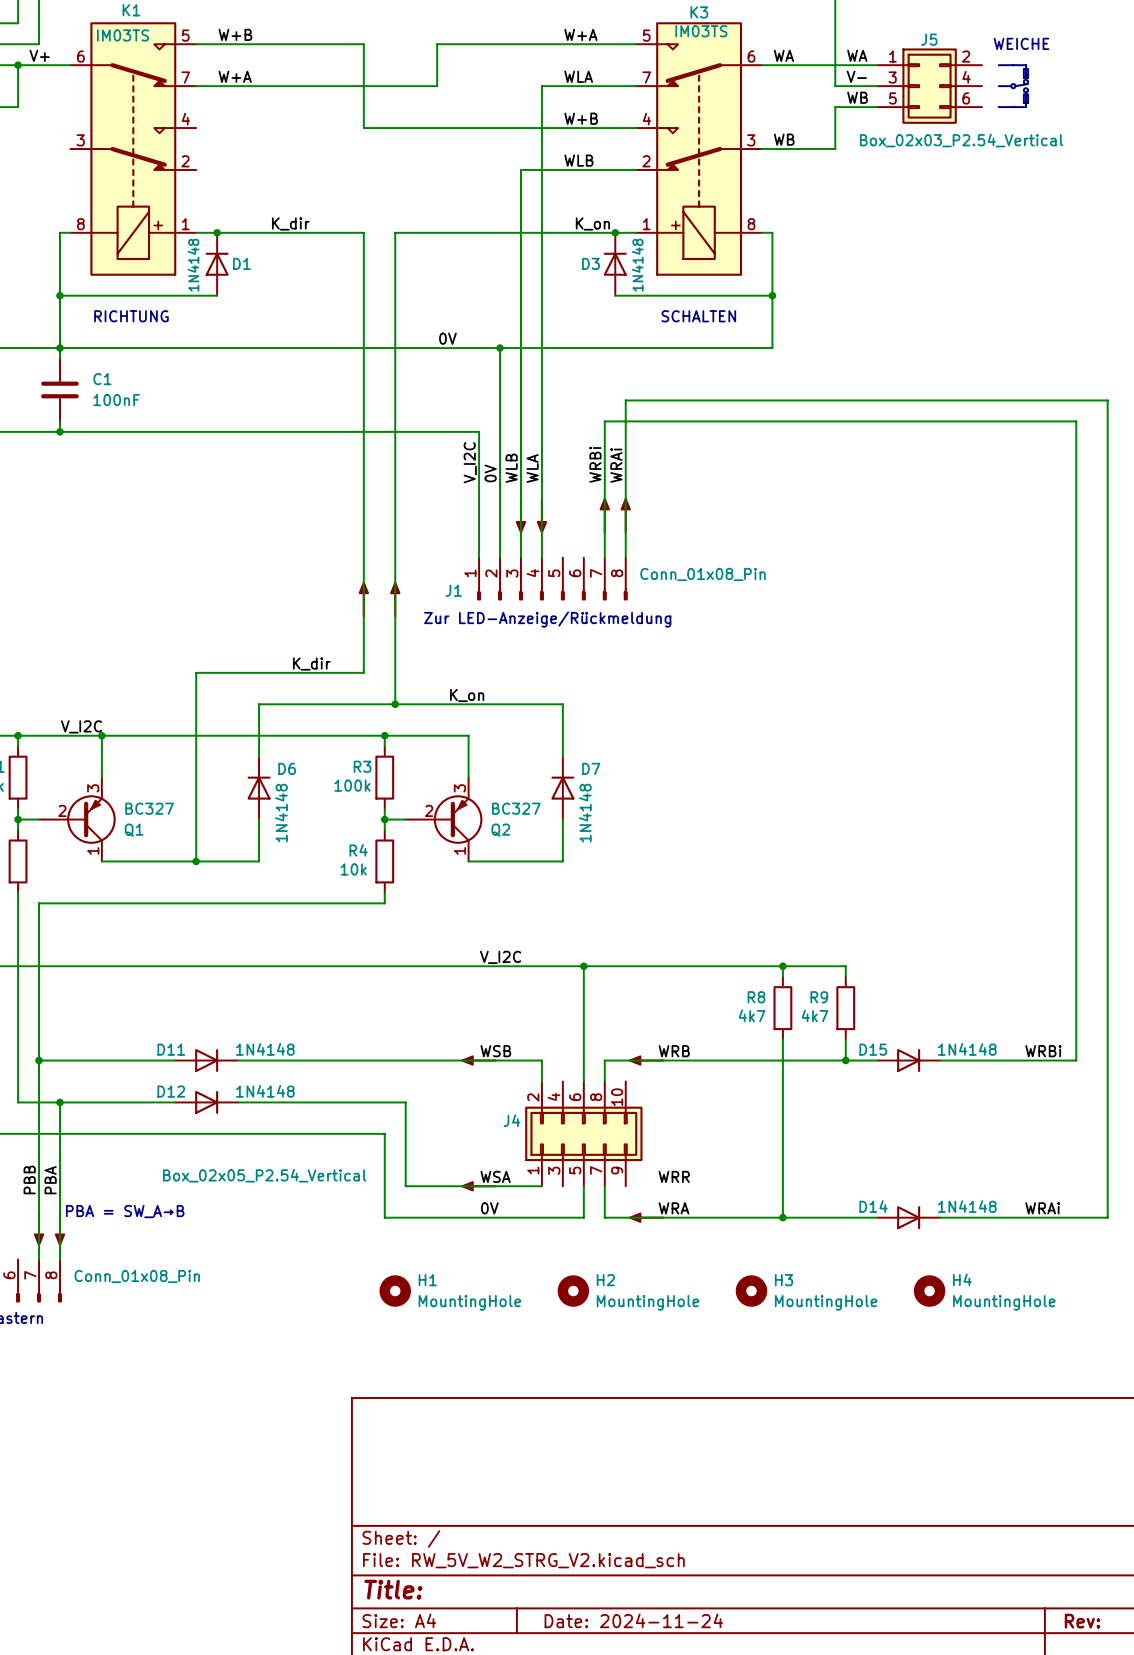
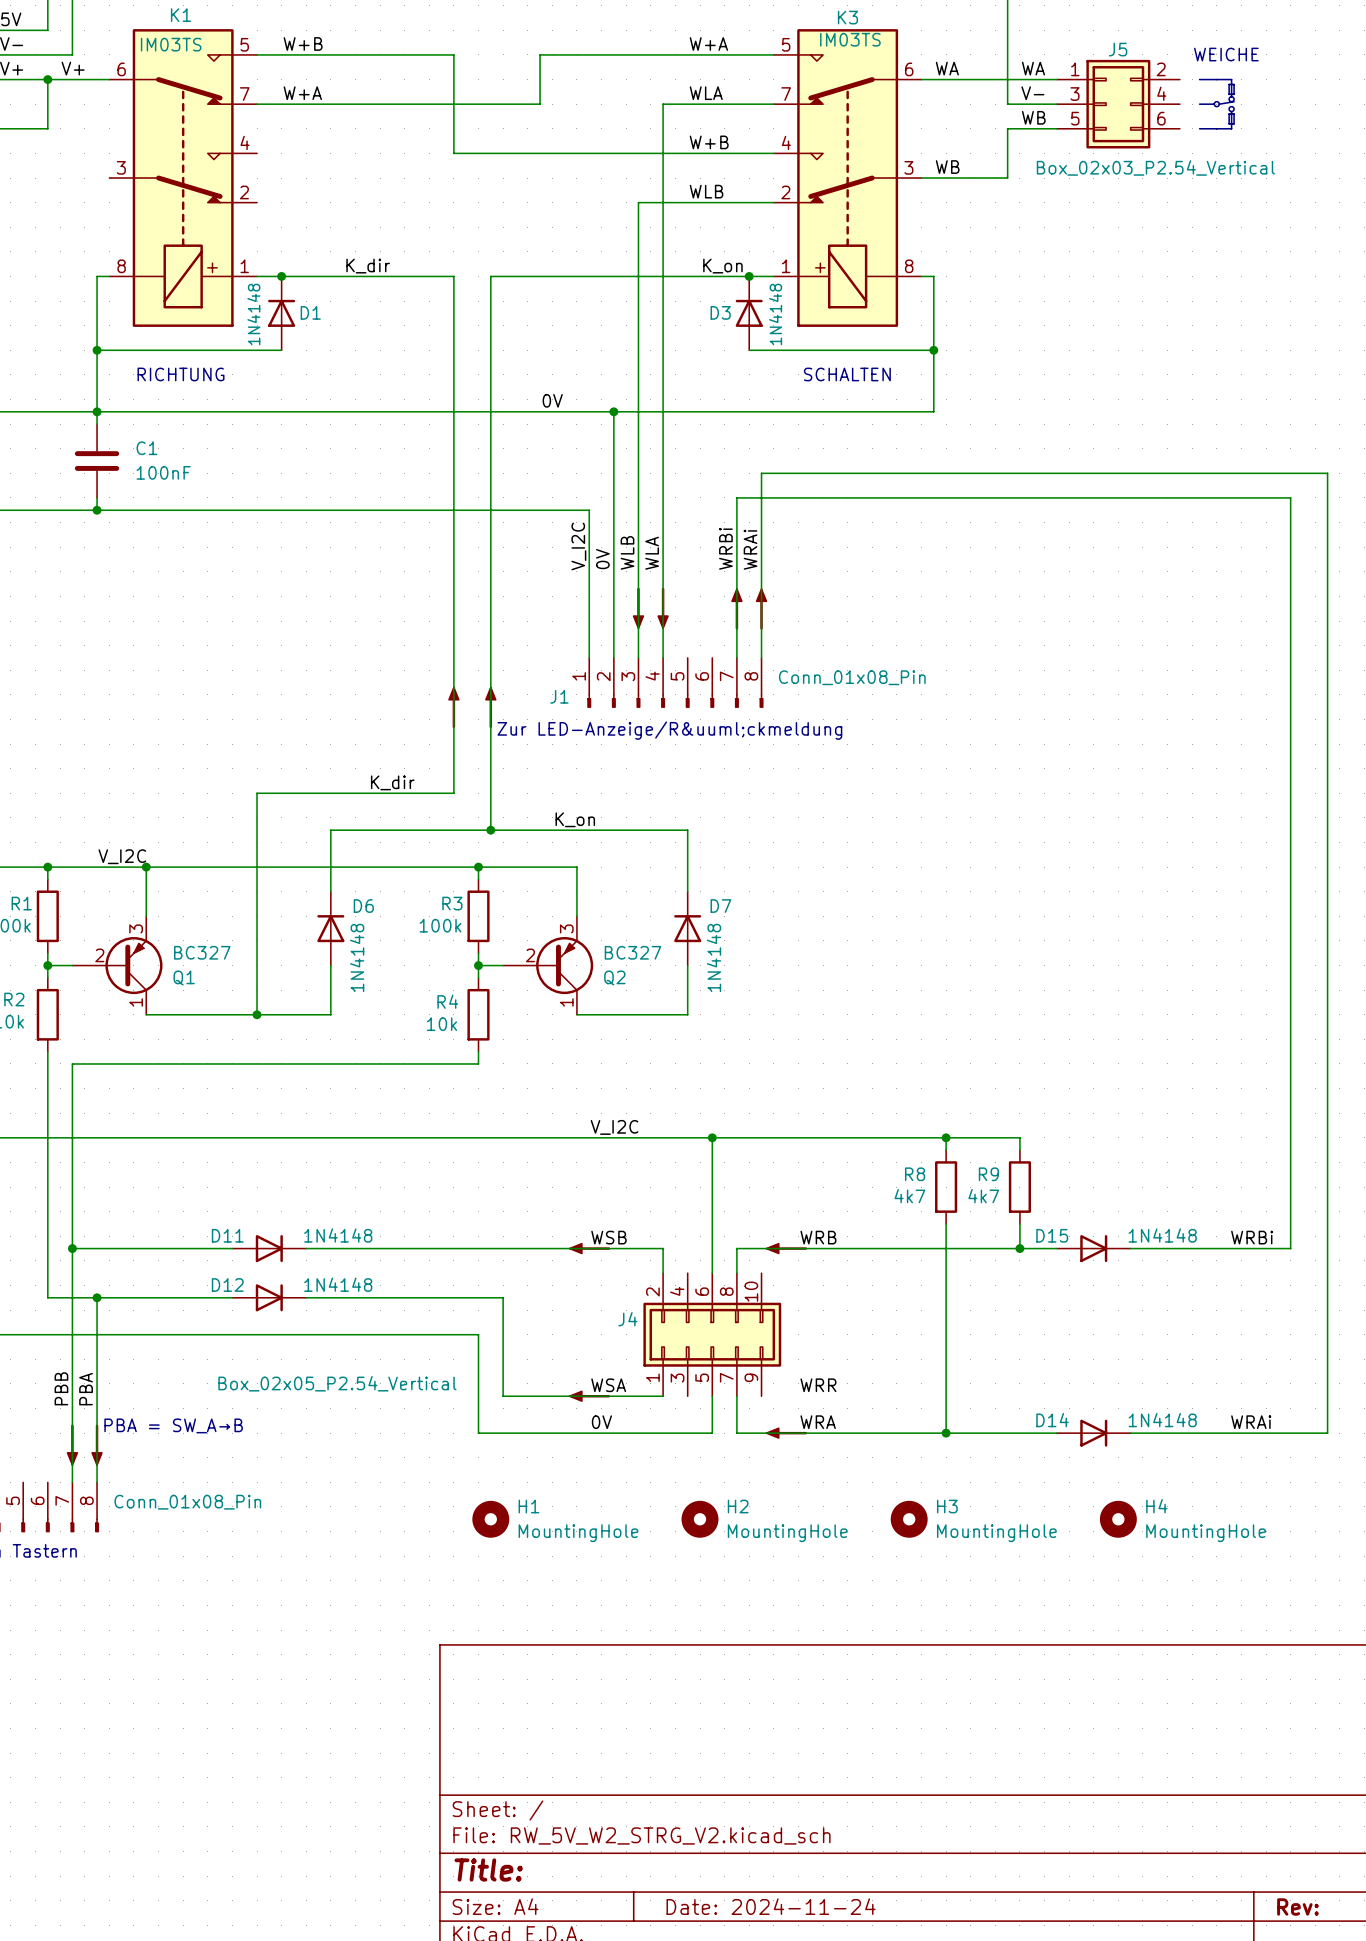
text: Zur LED-Anzeige/Rückmeldung (547, 619) -> Zur LED-Anzeige/R&uuml;ckmeldung (669, 730)

